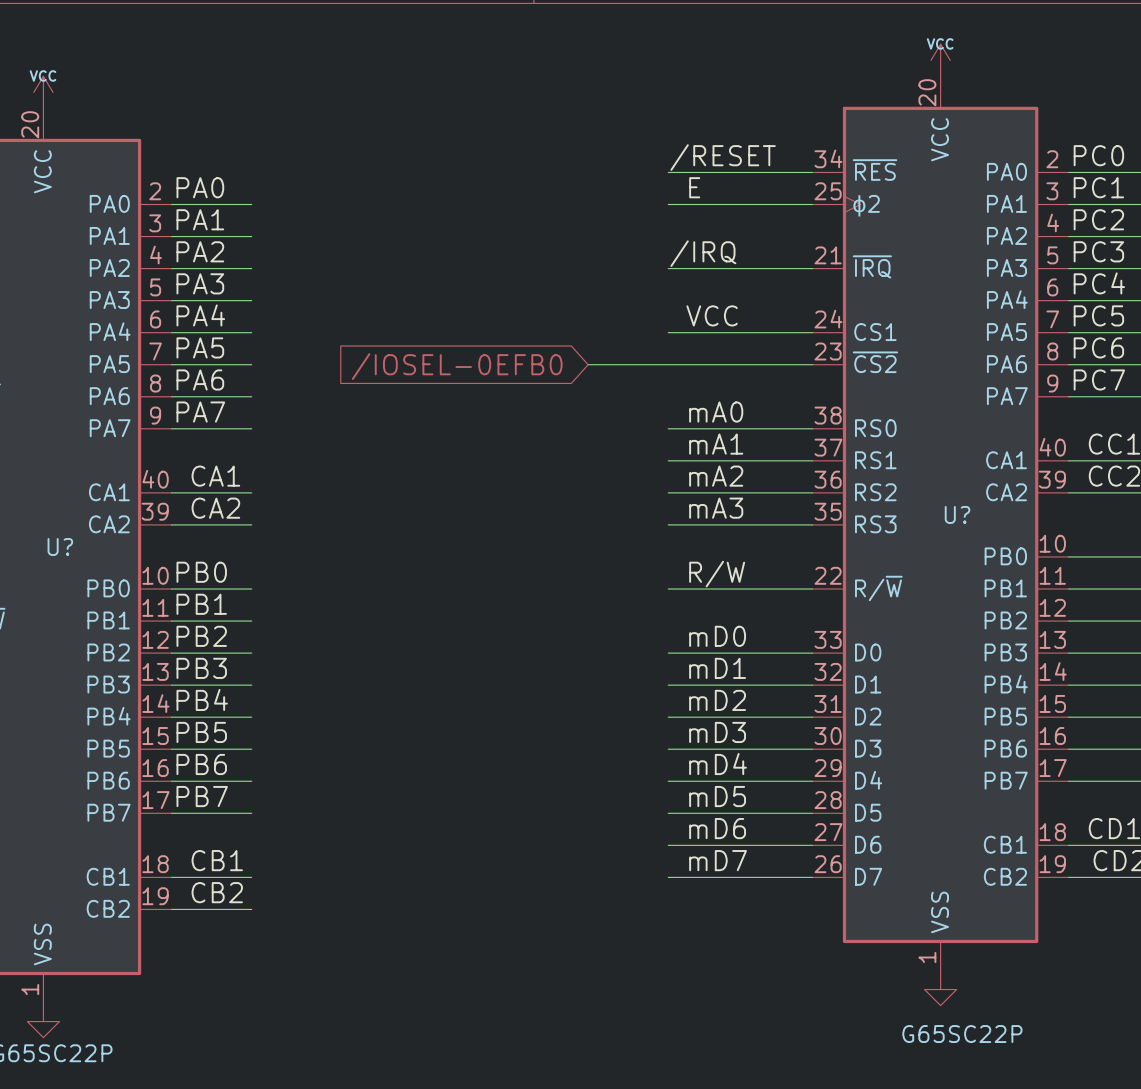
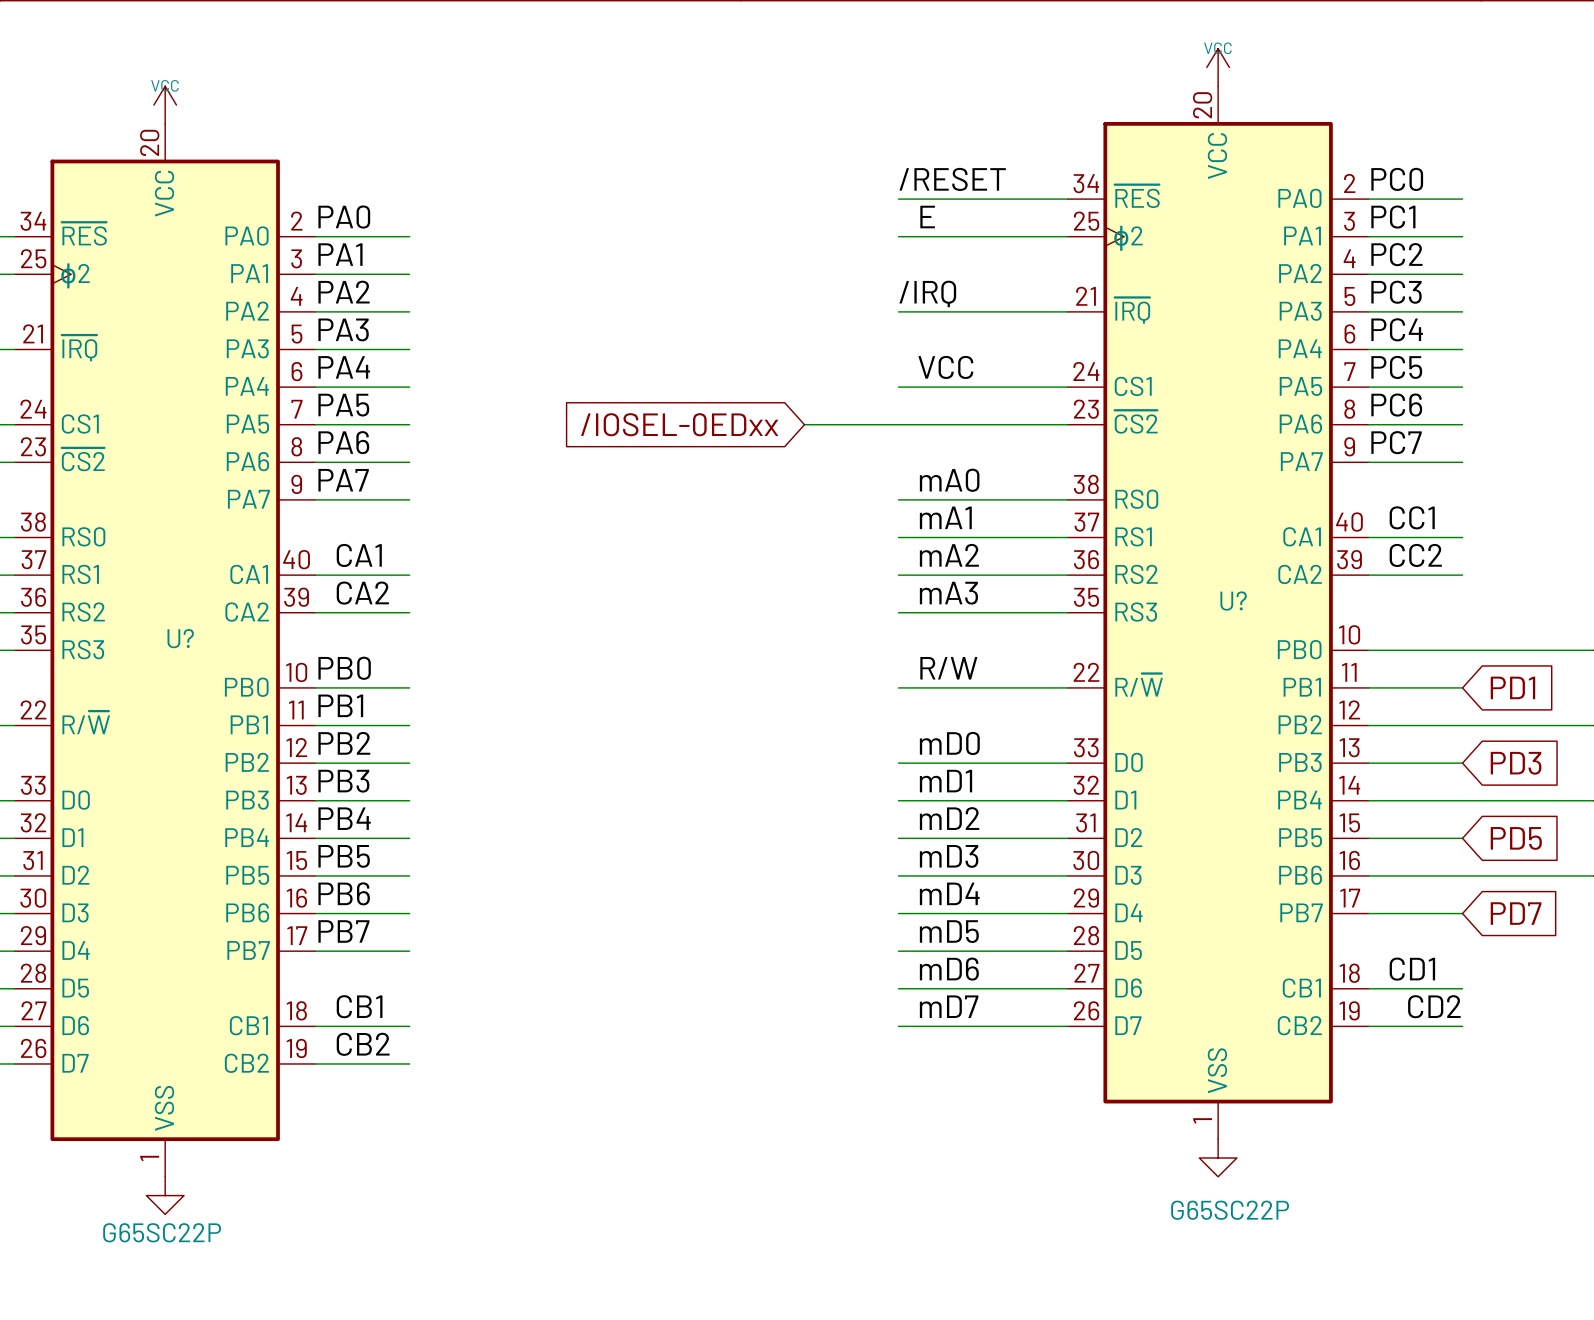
global label: /IOSEL-0EFB0 (457, 366) -> /IOSEL-0EDxx (679, 424)

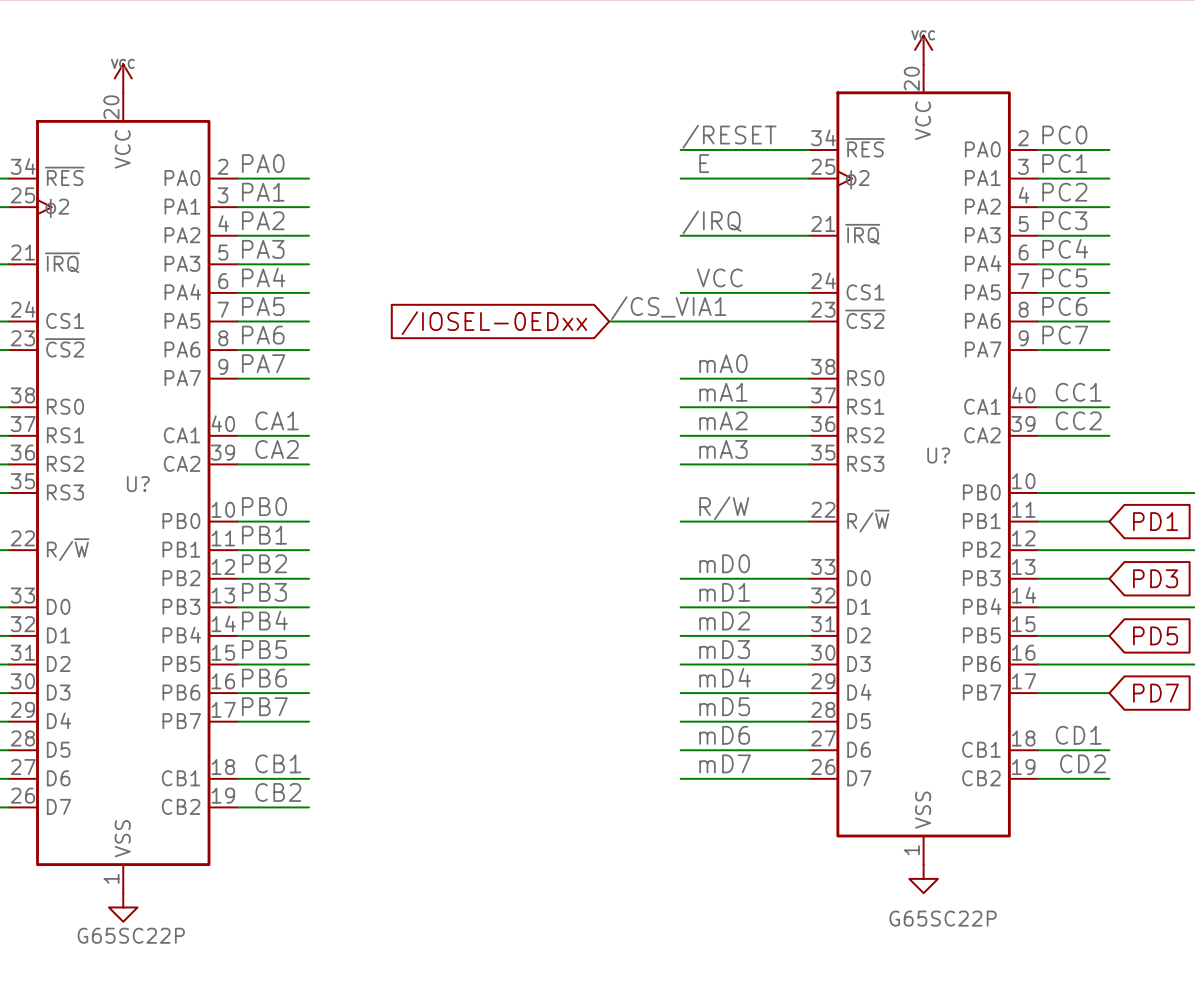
label: none -> /CS_VIA1 (668, 308)

